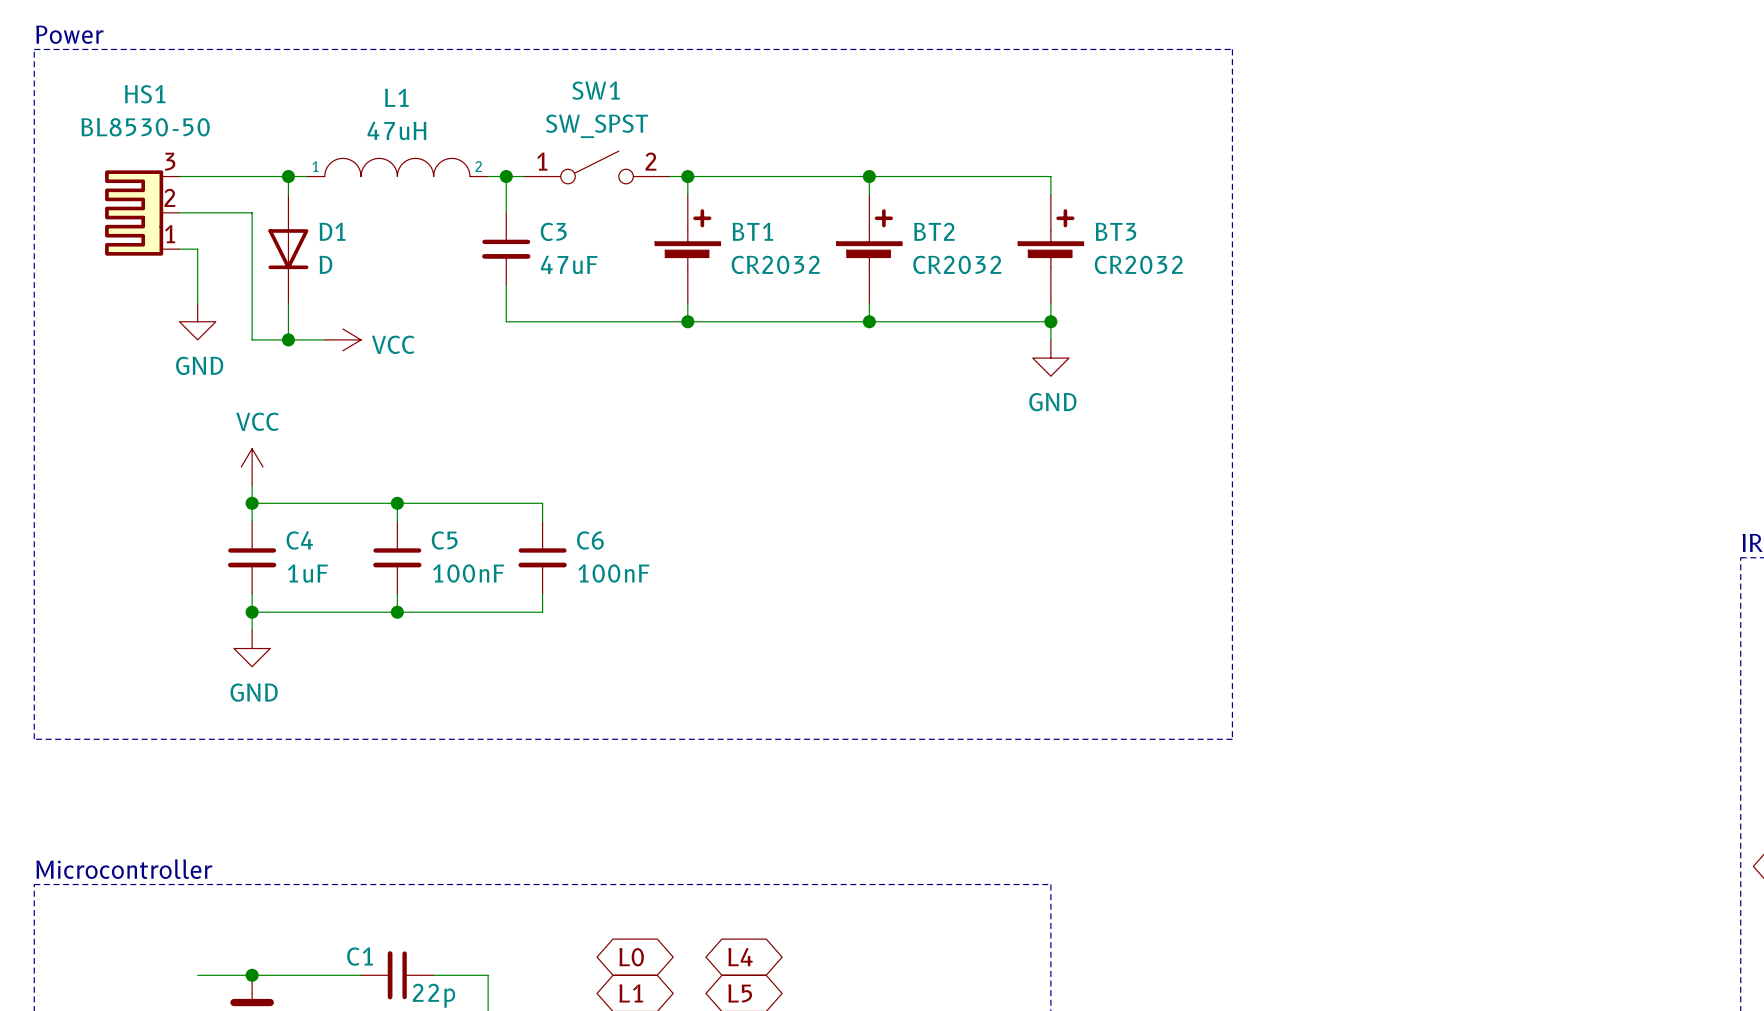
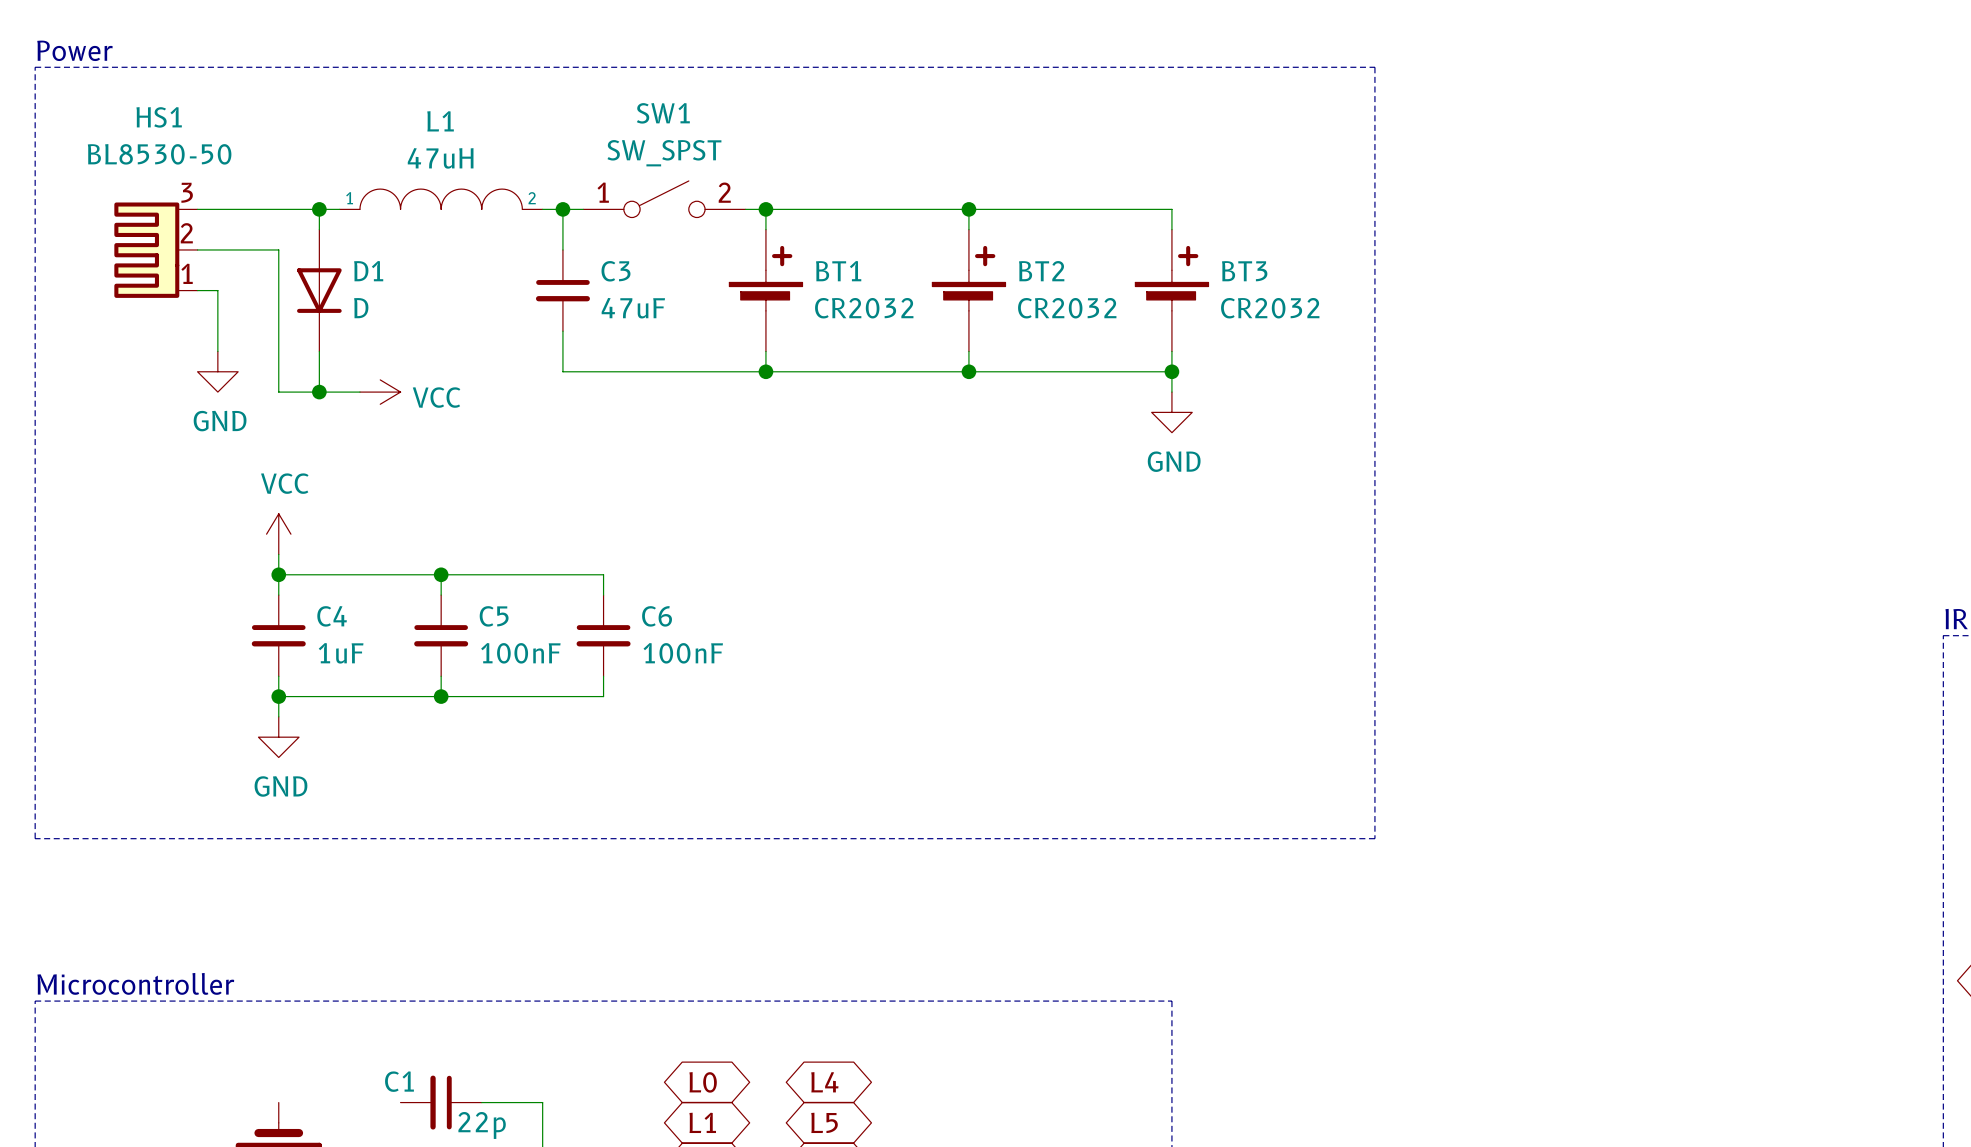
wire: (197, 975) (361, 975) -> none
junction: (252, 975) -> none

